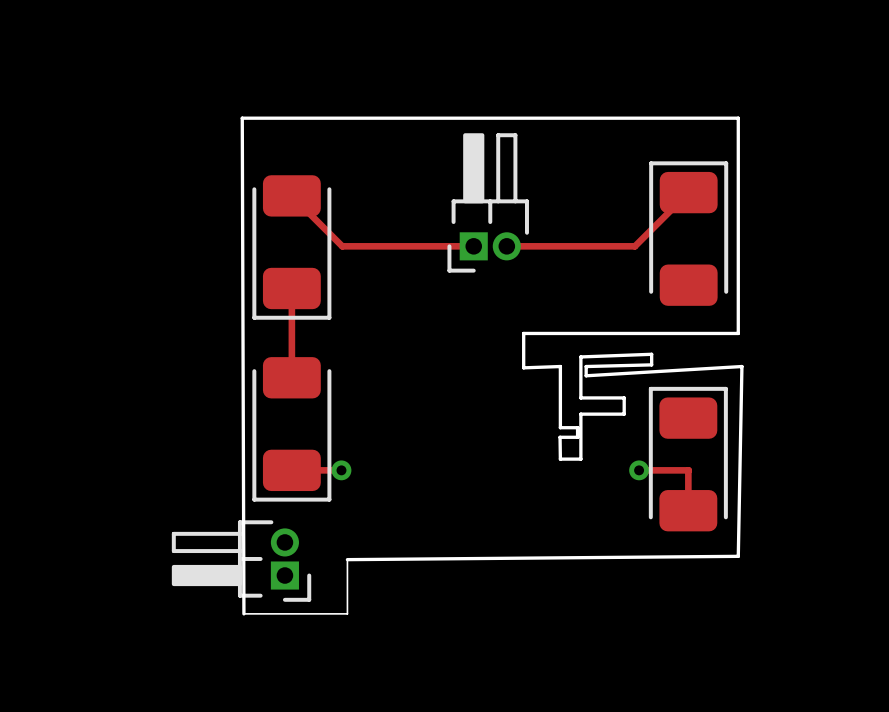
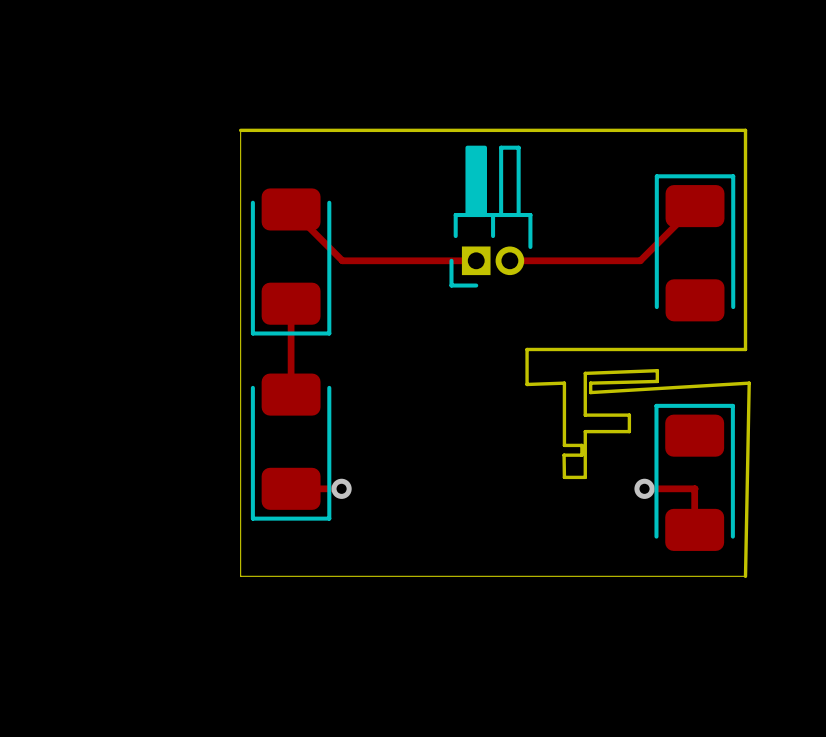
board edge: (242, 118) (243, 613) (347, 613) (347, 559) (738, 556) -> (240, 130) (240, 576) (745, 576)
part: (241, 561) -> none

